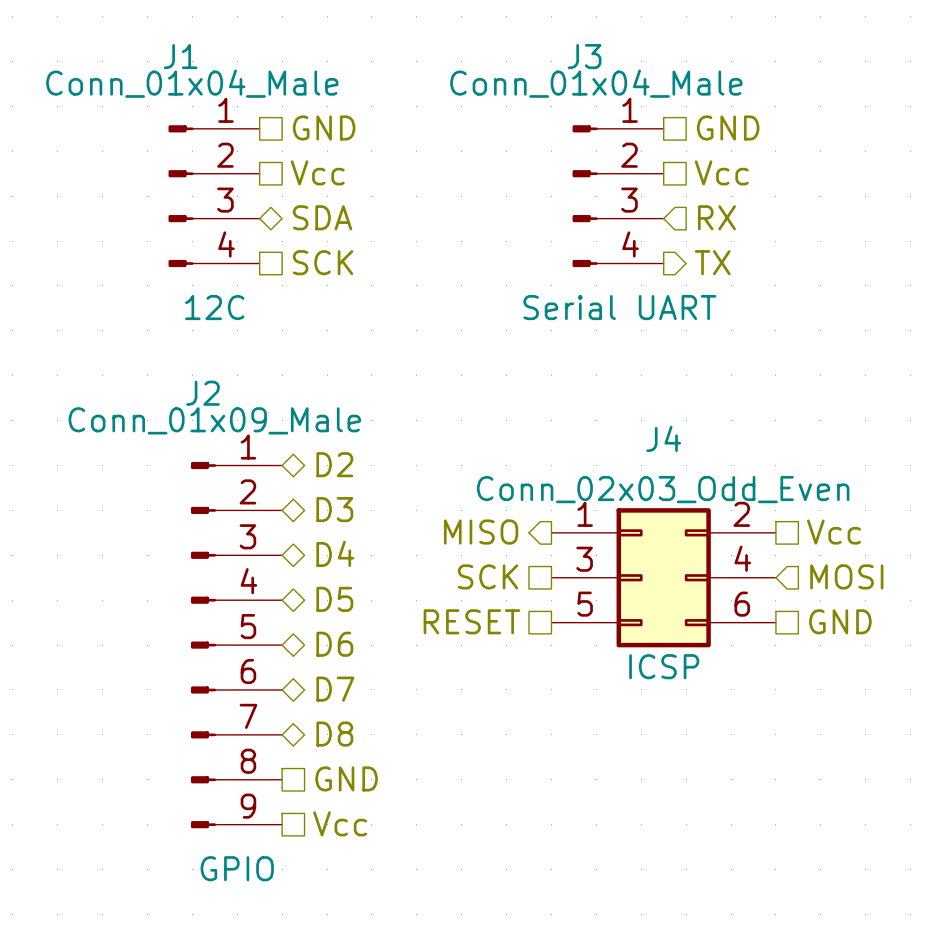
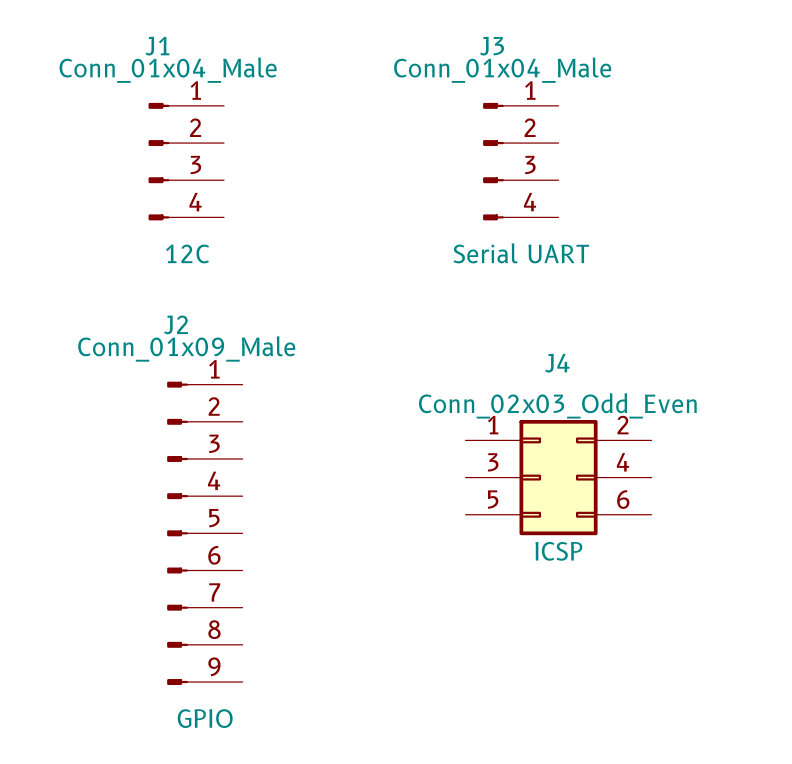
hierarchical label: GND (324, 127) -> none
hierarchical label: GND (728, 127) -> none
hierarchical label: Vcc (317, 172) -> none
hierarchical label: Vcc (721, 172) -> none
hierarchical label: SDA (322, 217) -> none
hierarchical label: RX (716, 217) -> none
hierarchical label: SCK (323, 262) -> none
hierarchical label: TX (712, 262) -> none
hierarchical label: D2 (334, 464) -> none
hierarchical label: D3 (334, 509) -> none
hierarchical label: MISO (481, 532) -> none
hierarchical label: Vcc (833, 532) -> none
hierarchical label: D4 (335, 553) -> none
hierarchical label: SCK (488, 576) -> none
hierarchical label: MOSI (846, 576) -> none
hierarchical label: D5 (334, 599) -> none
hierarchical label: RESET (472, 621) -> none
hierarchical label: GND (840, 621) -> none
hierarchical label: D6 (334, 644) -> none
hierarchical label: D7 (335, 689) -> none
hierarchical label: D8 (334, 734) -> none
hierarchical label: GND (346, 778) -> none
hierarchical label: Vcc (340, 823) -> none

